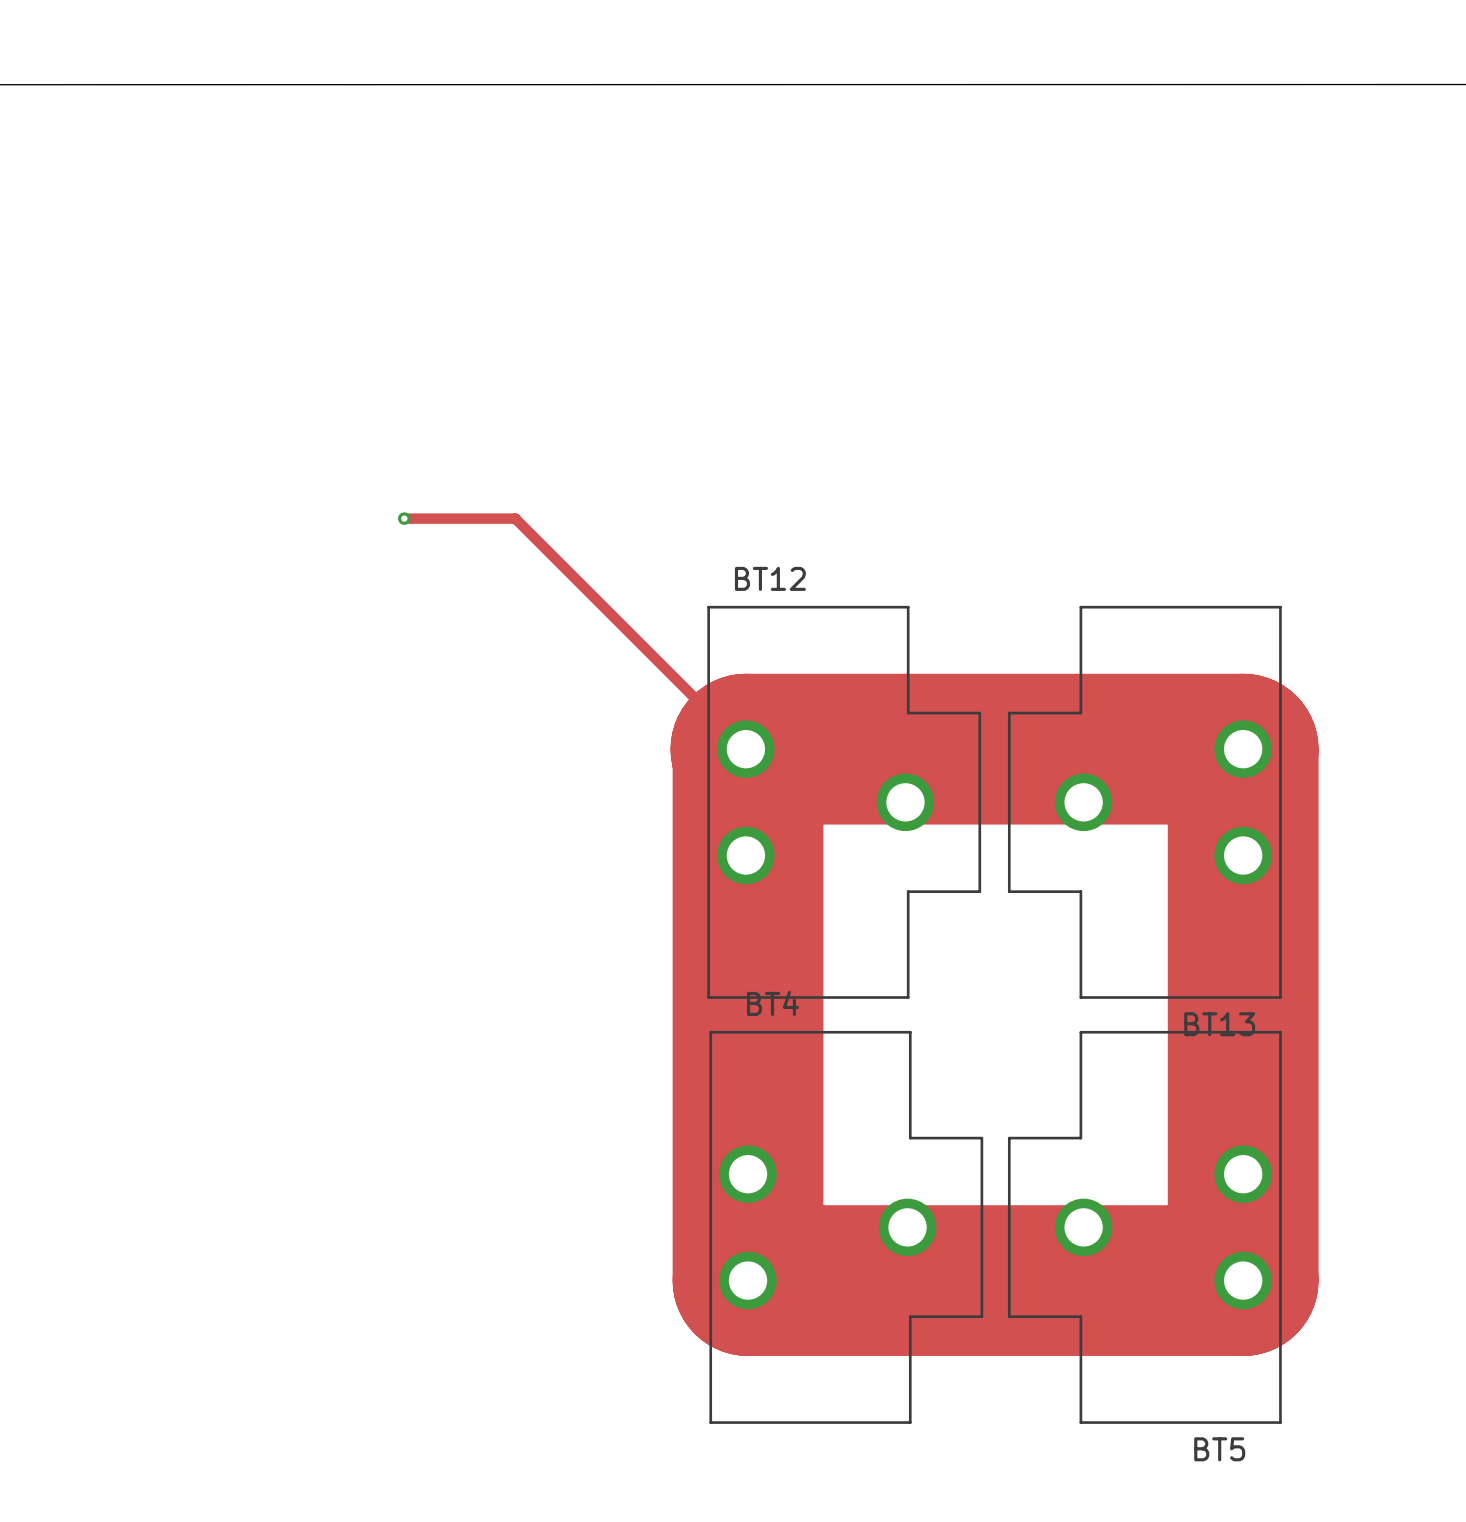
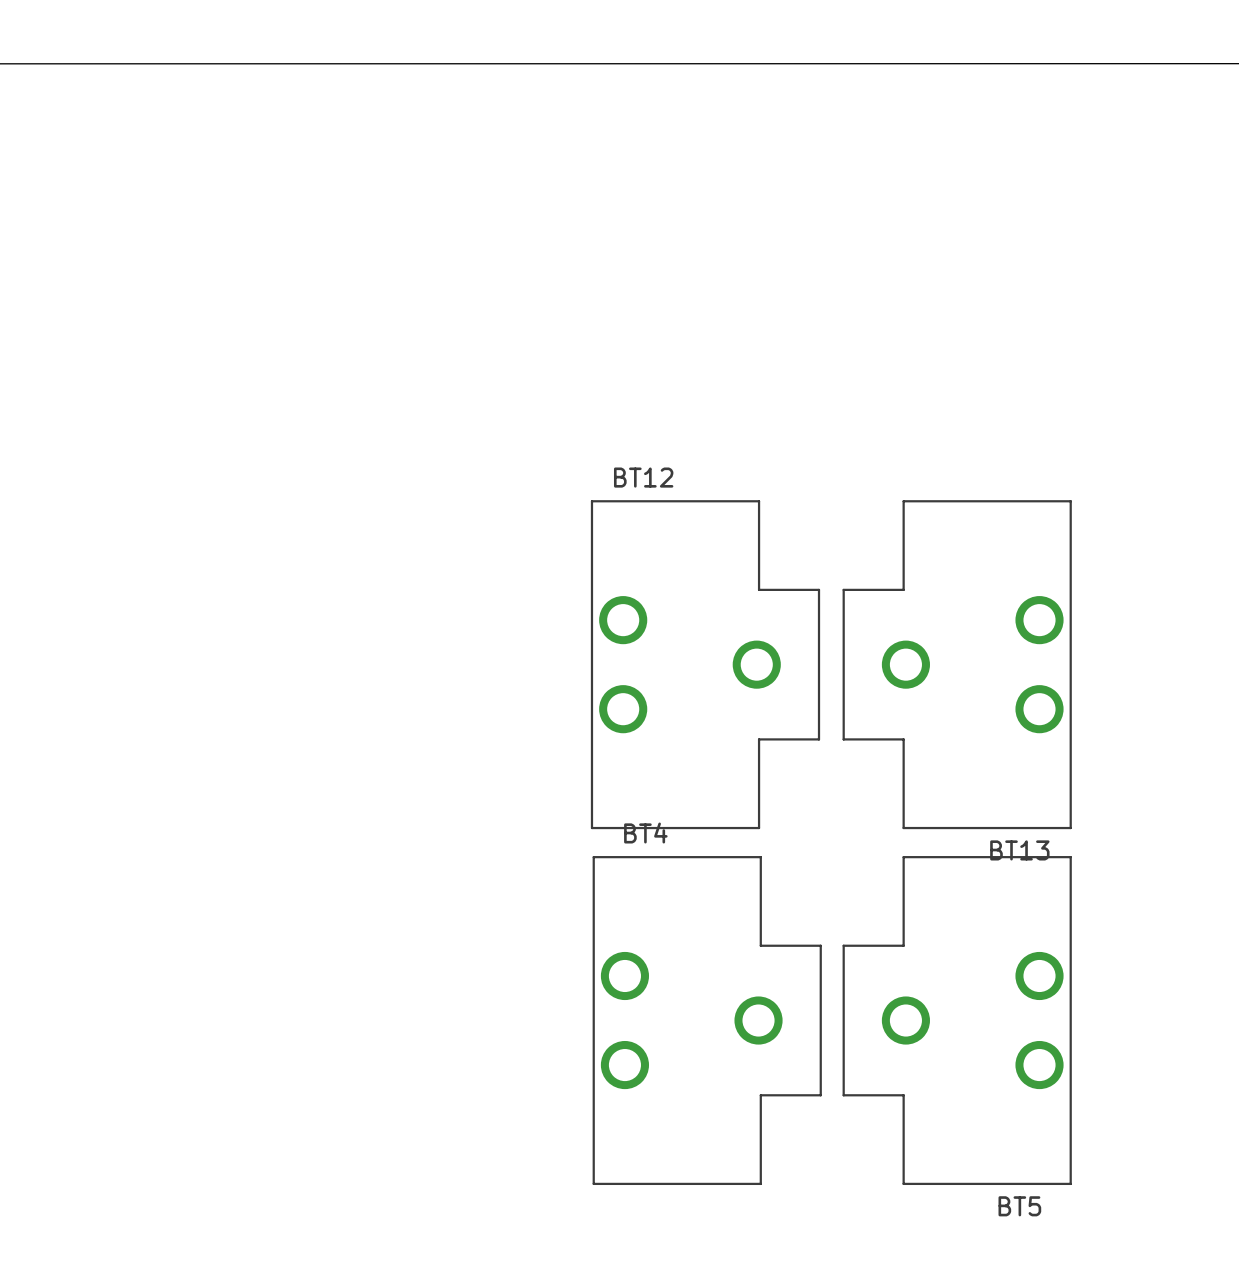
track: (404, 518) (515, 518) (745, 749) -> none
via: (404, 518) -> none
track: (745, 749) (1243, 749) (1243, 1280) (748, 1280) (748, 751) (745, 749) -> none

